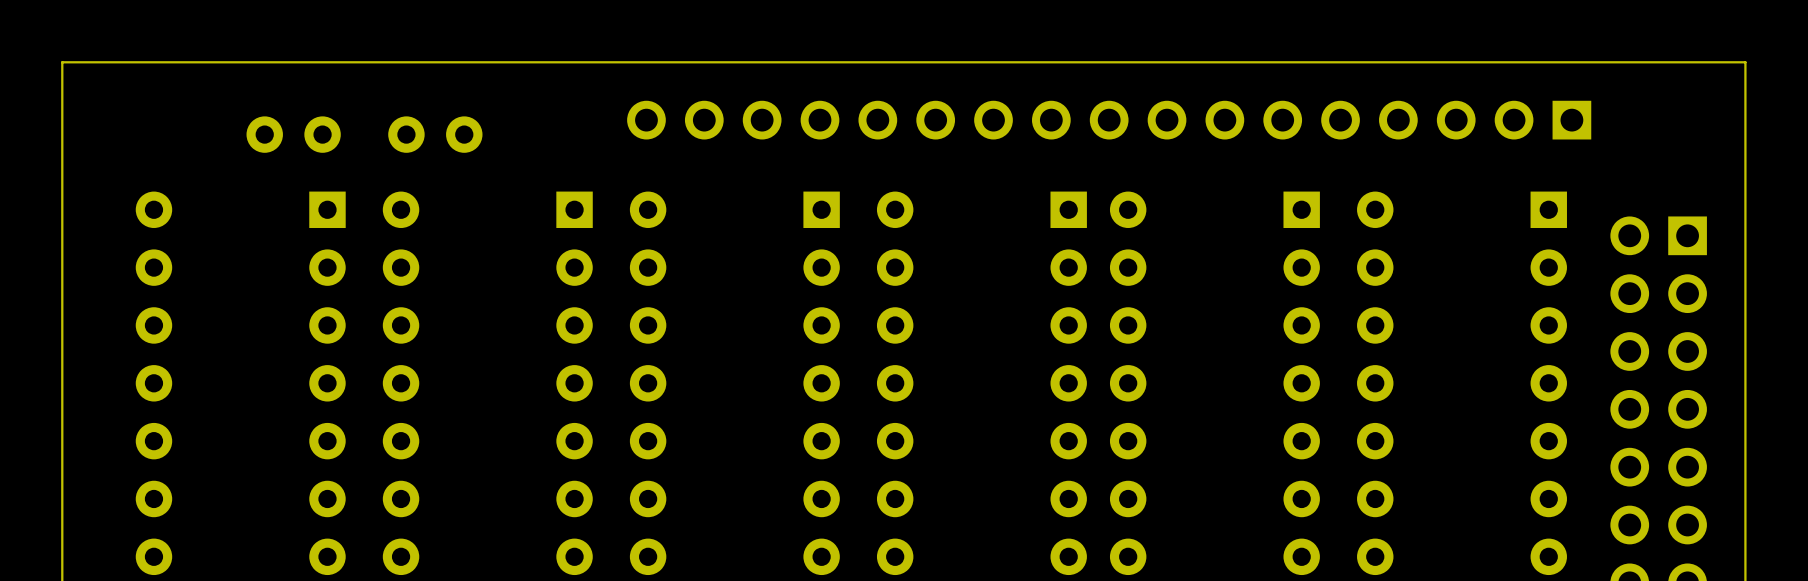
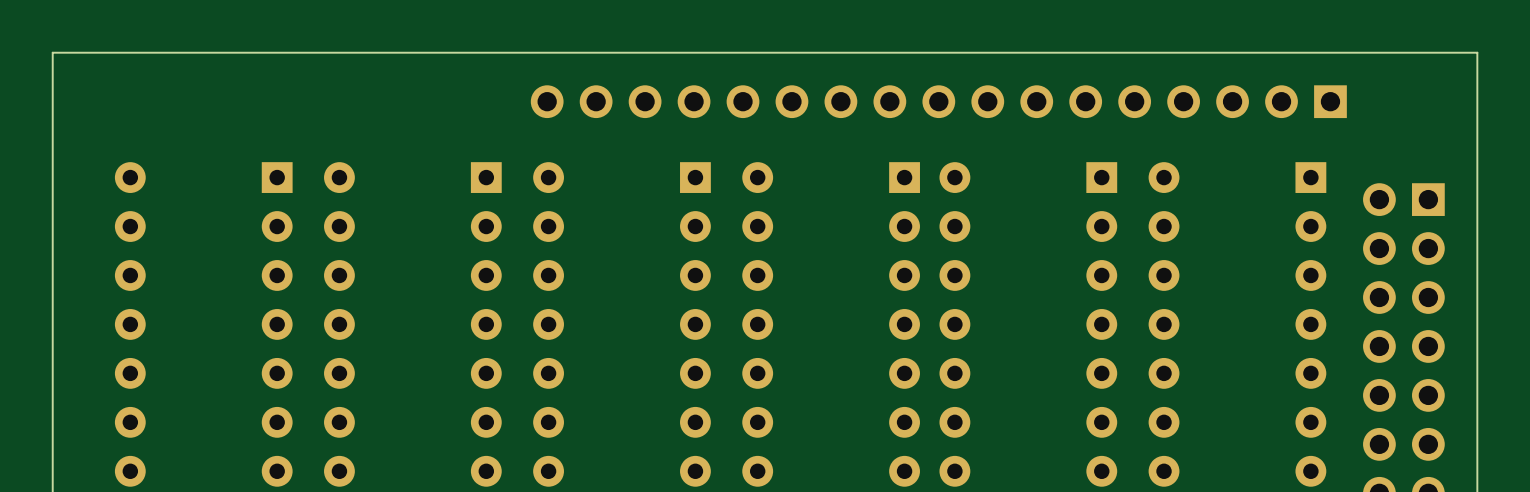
part: (293, 134) -> none
part: (435, 134) -> none

